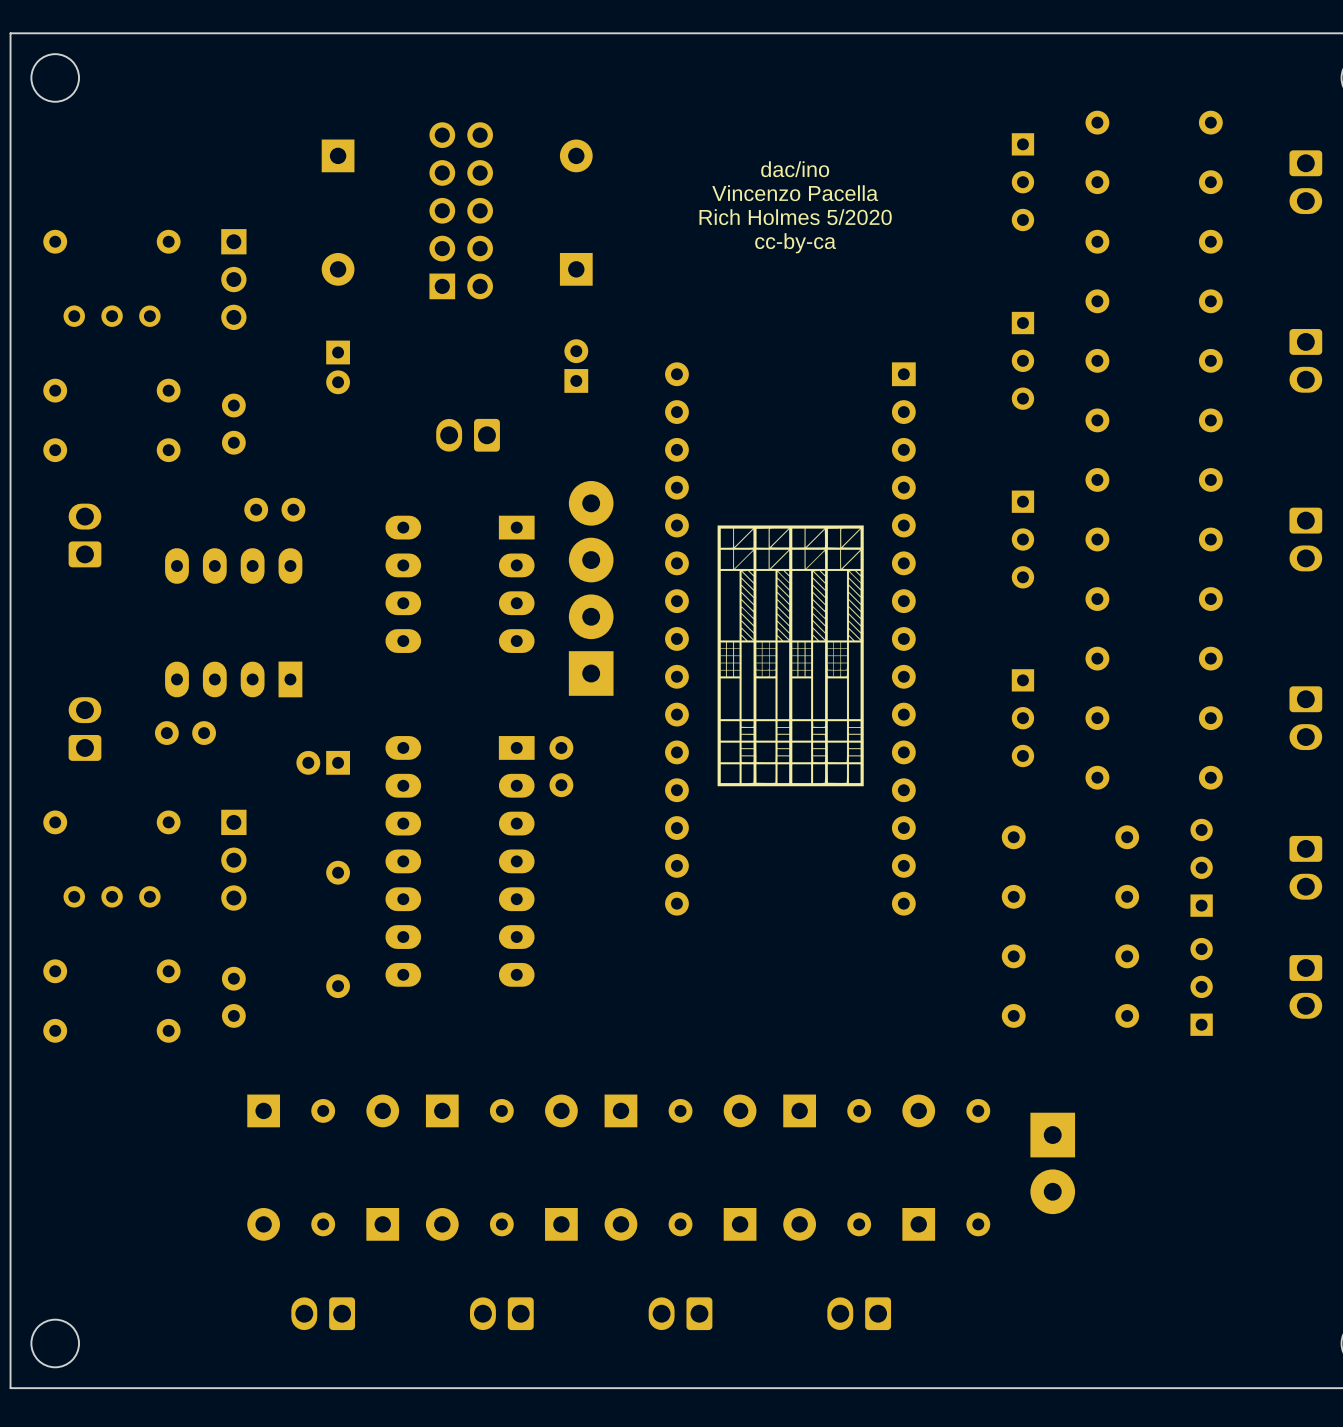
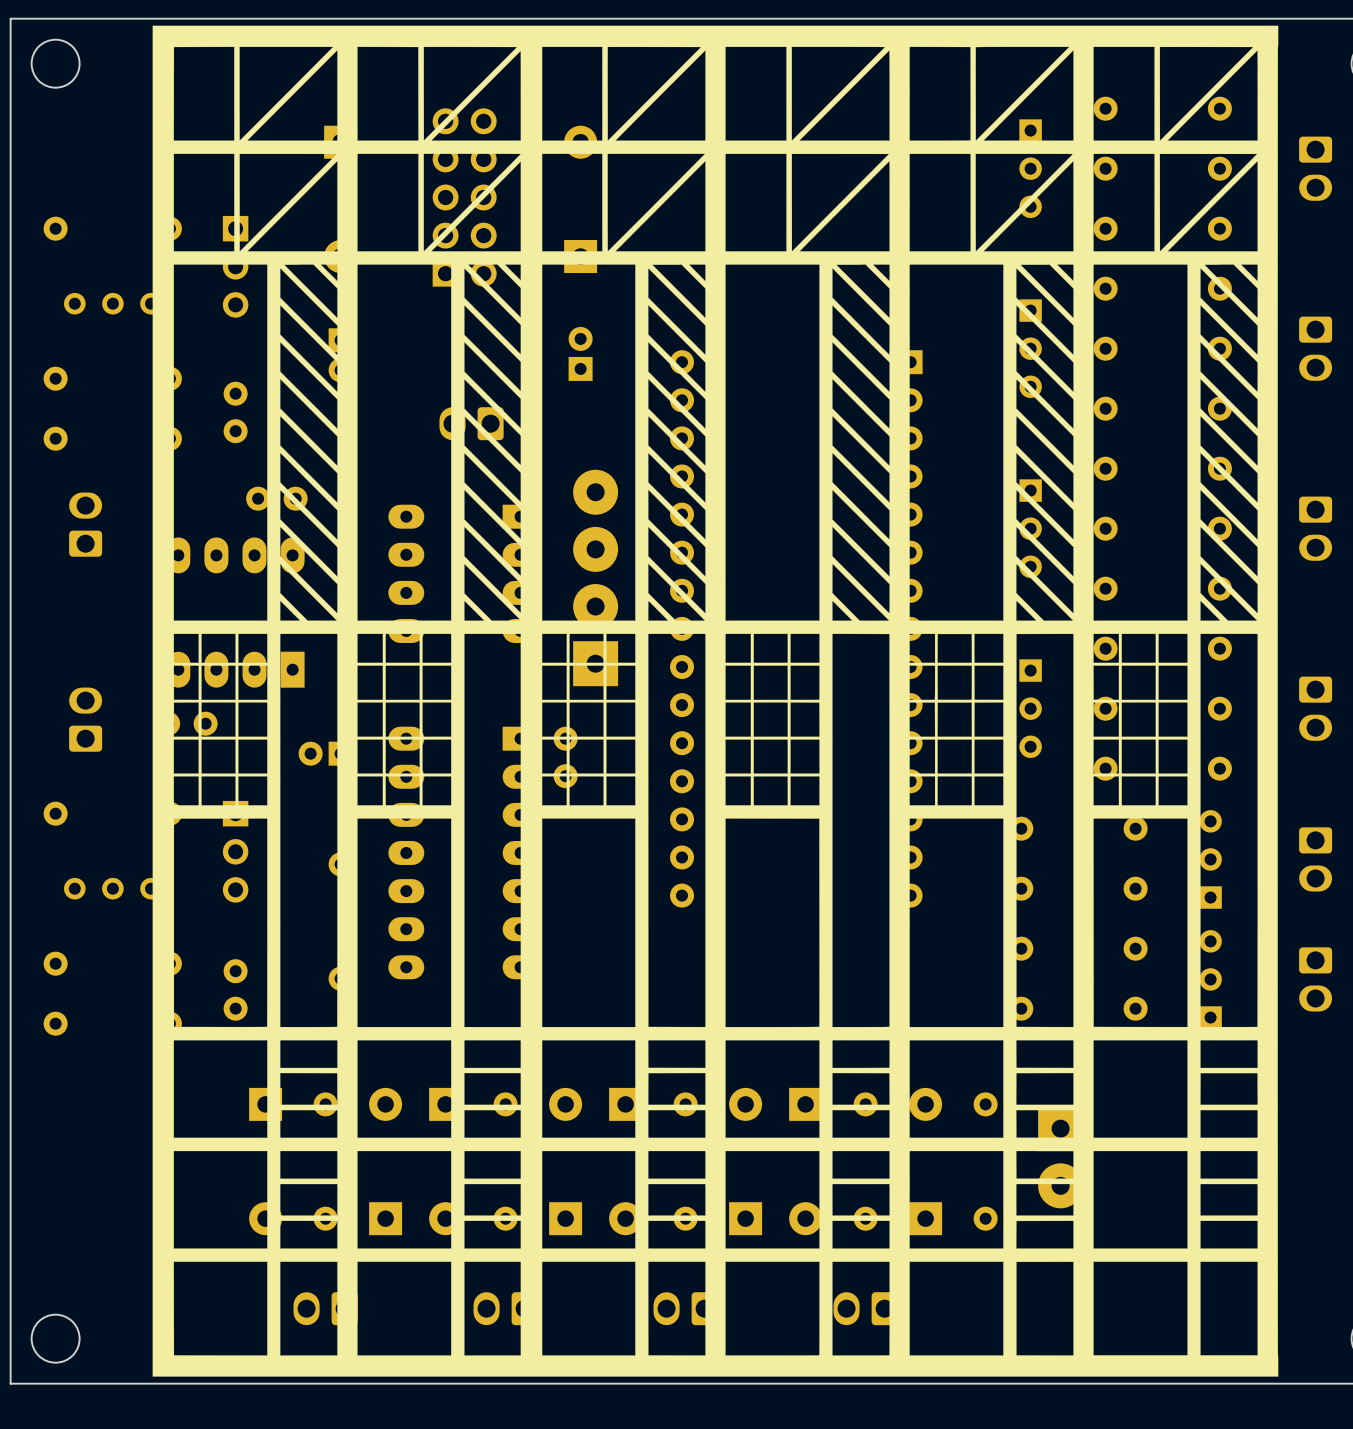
drawing: none -> [152, 25, 1279, 1377]
text: dac/ino (795, 169) -> none
text: Vincenzo Pacella (795, 193) -> none
text: Rich Holmes 5/2020 (795, 217) -> none
text: cc-by-ca (795, 243) -> none
drawing: [717, 525, 864, 787] -> none

